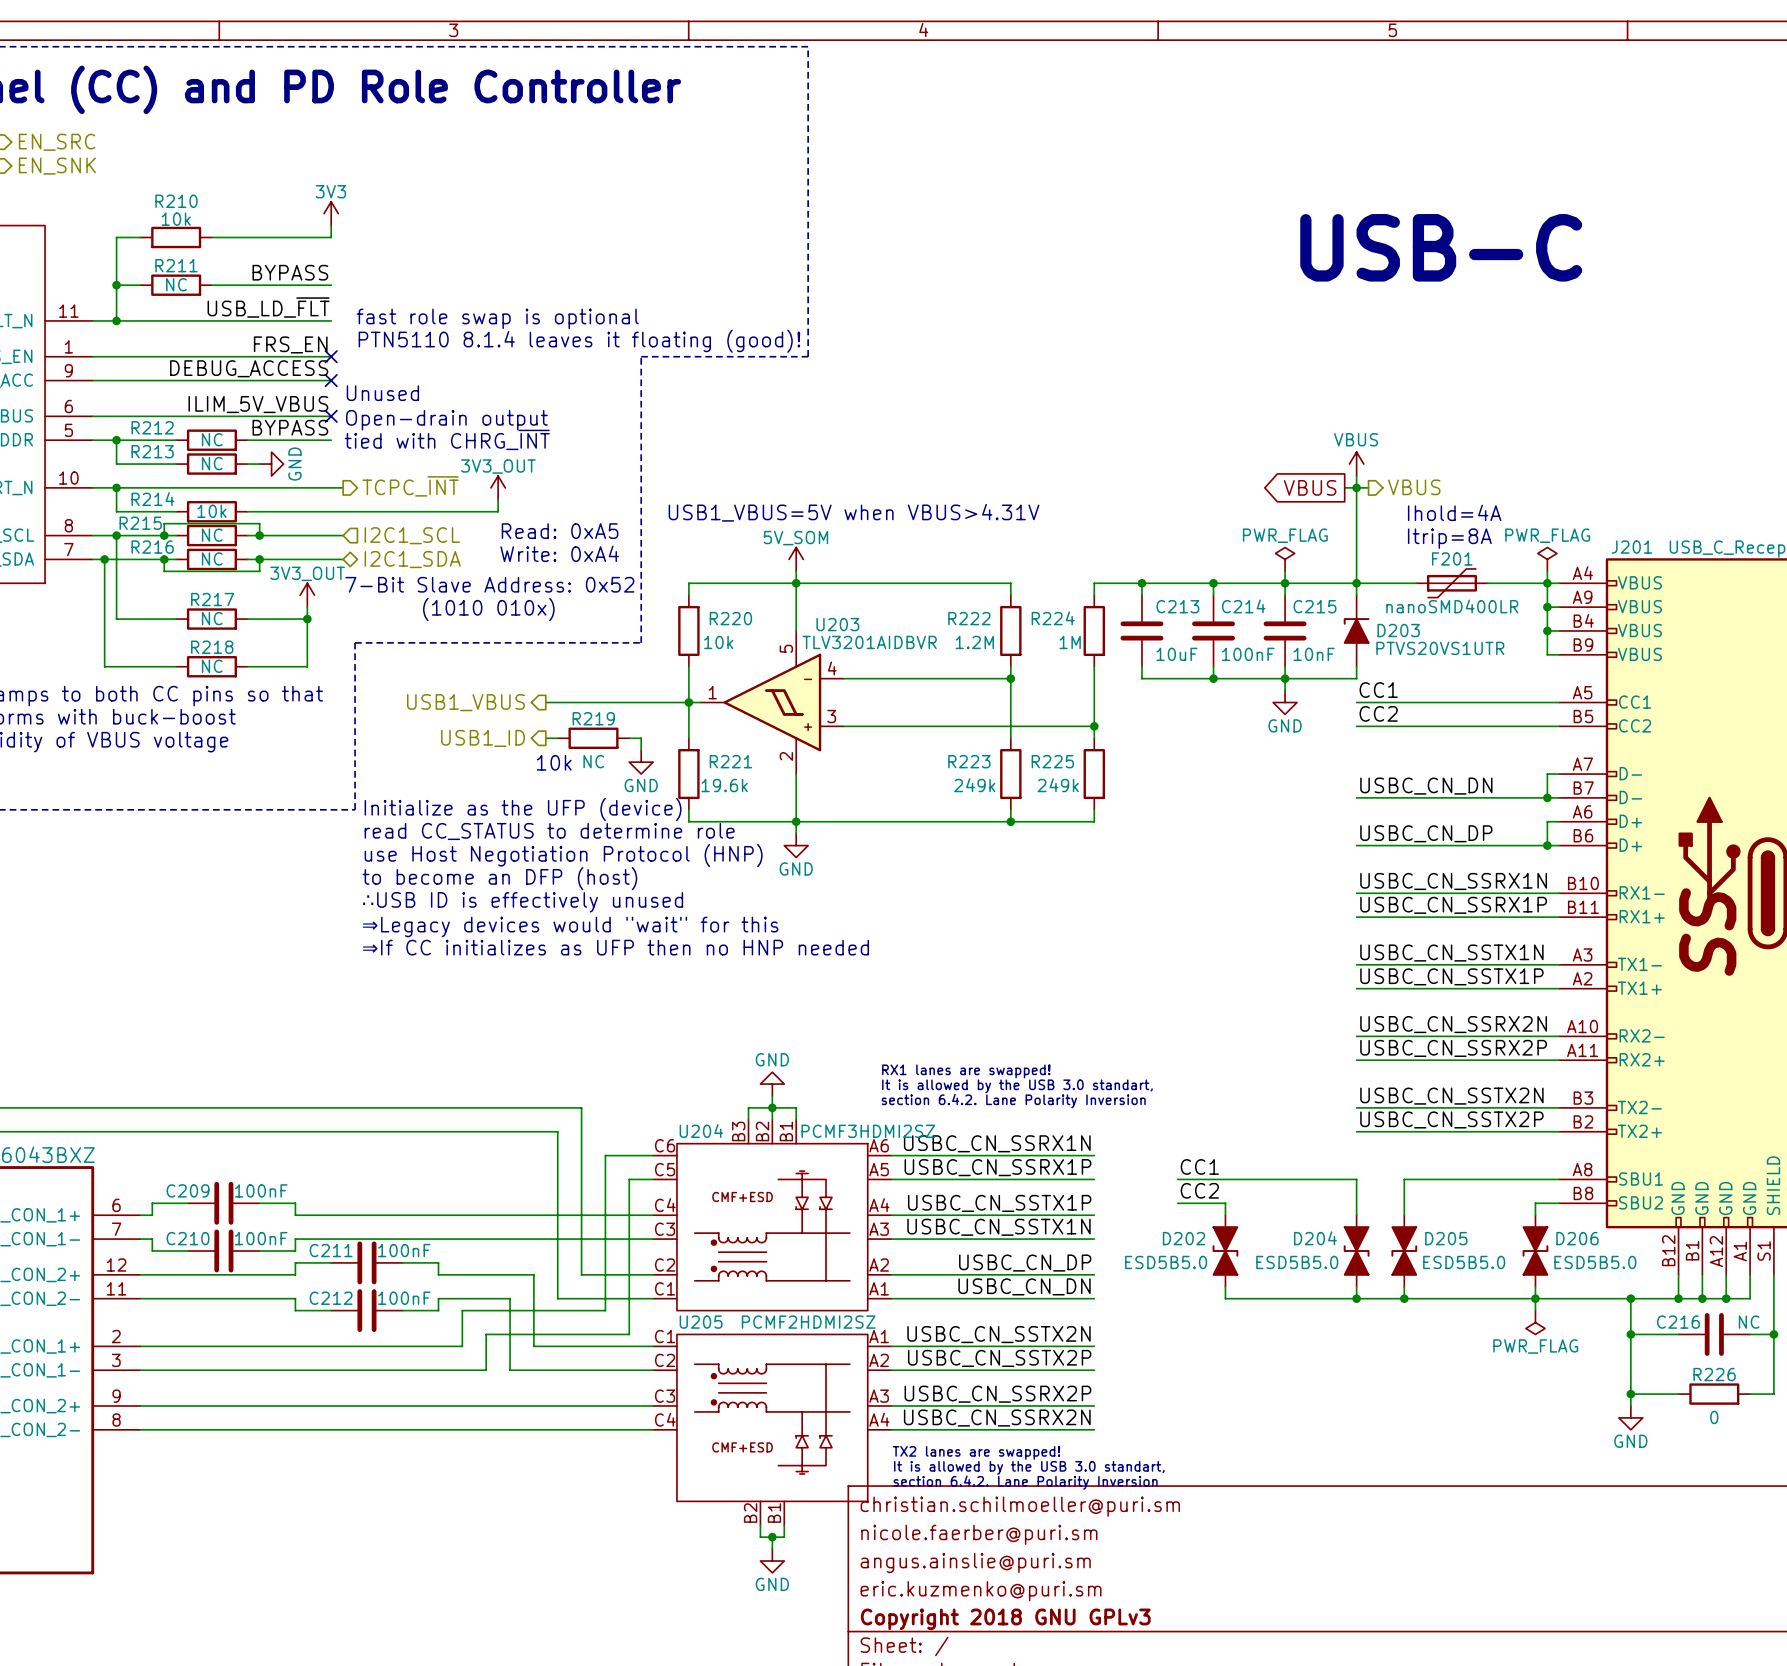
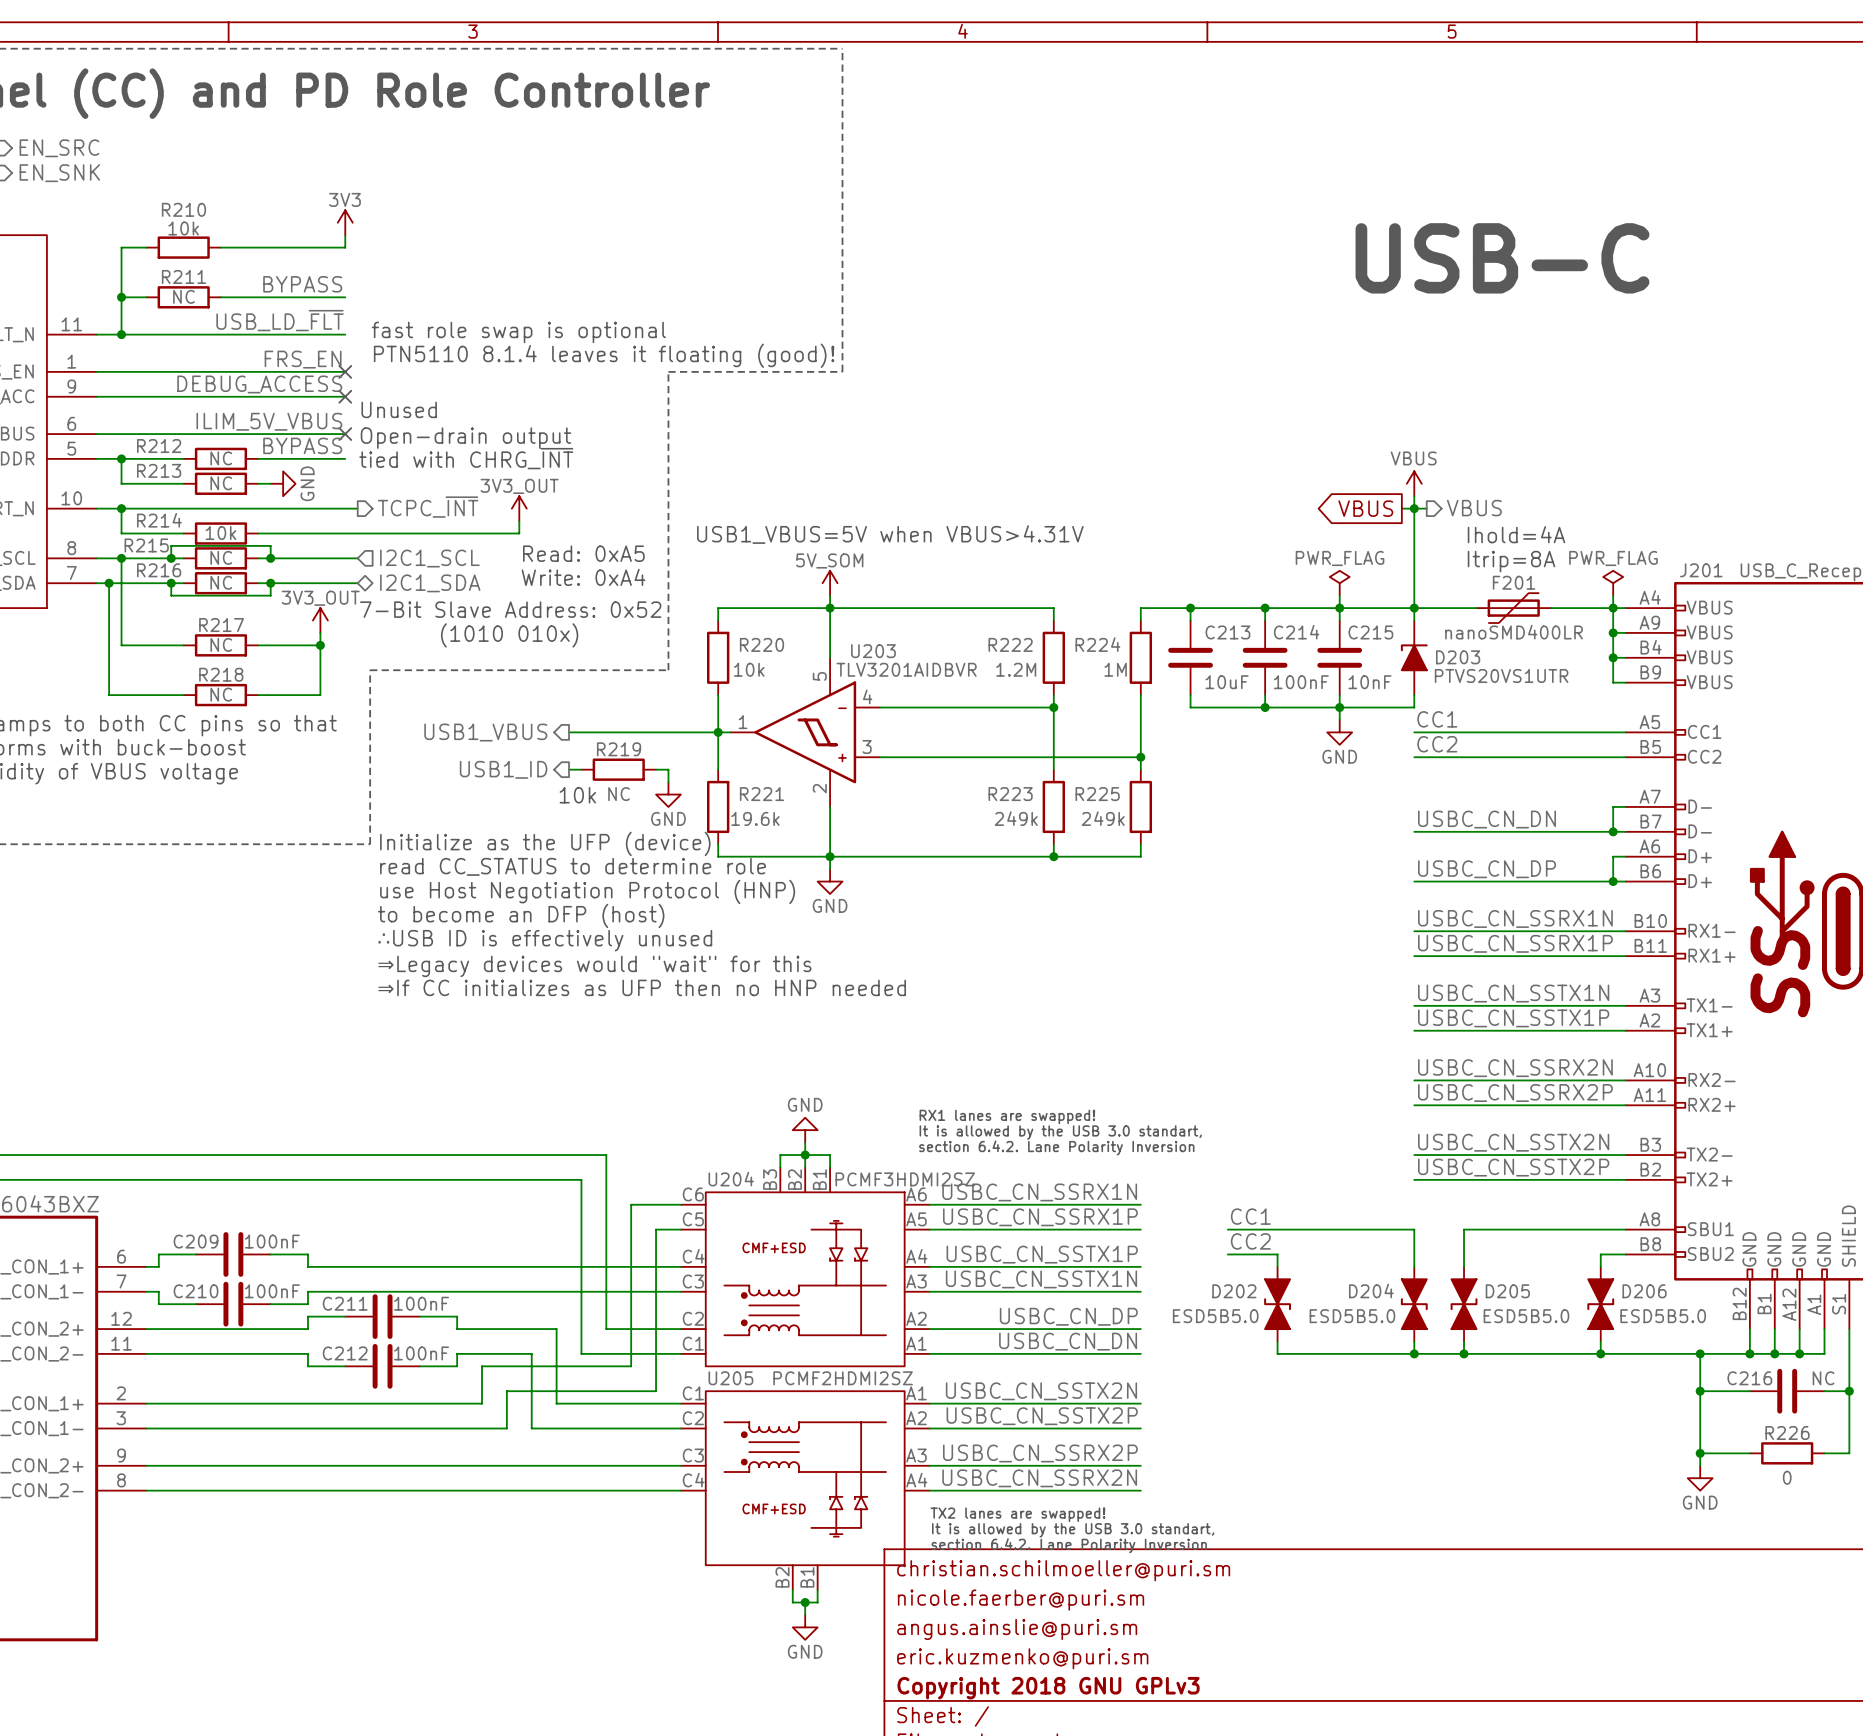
wire: (1535, 1298) (1535, 1310) -> none
power symbol: PWR_FLAG (1535, 1322) -> none

